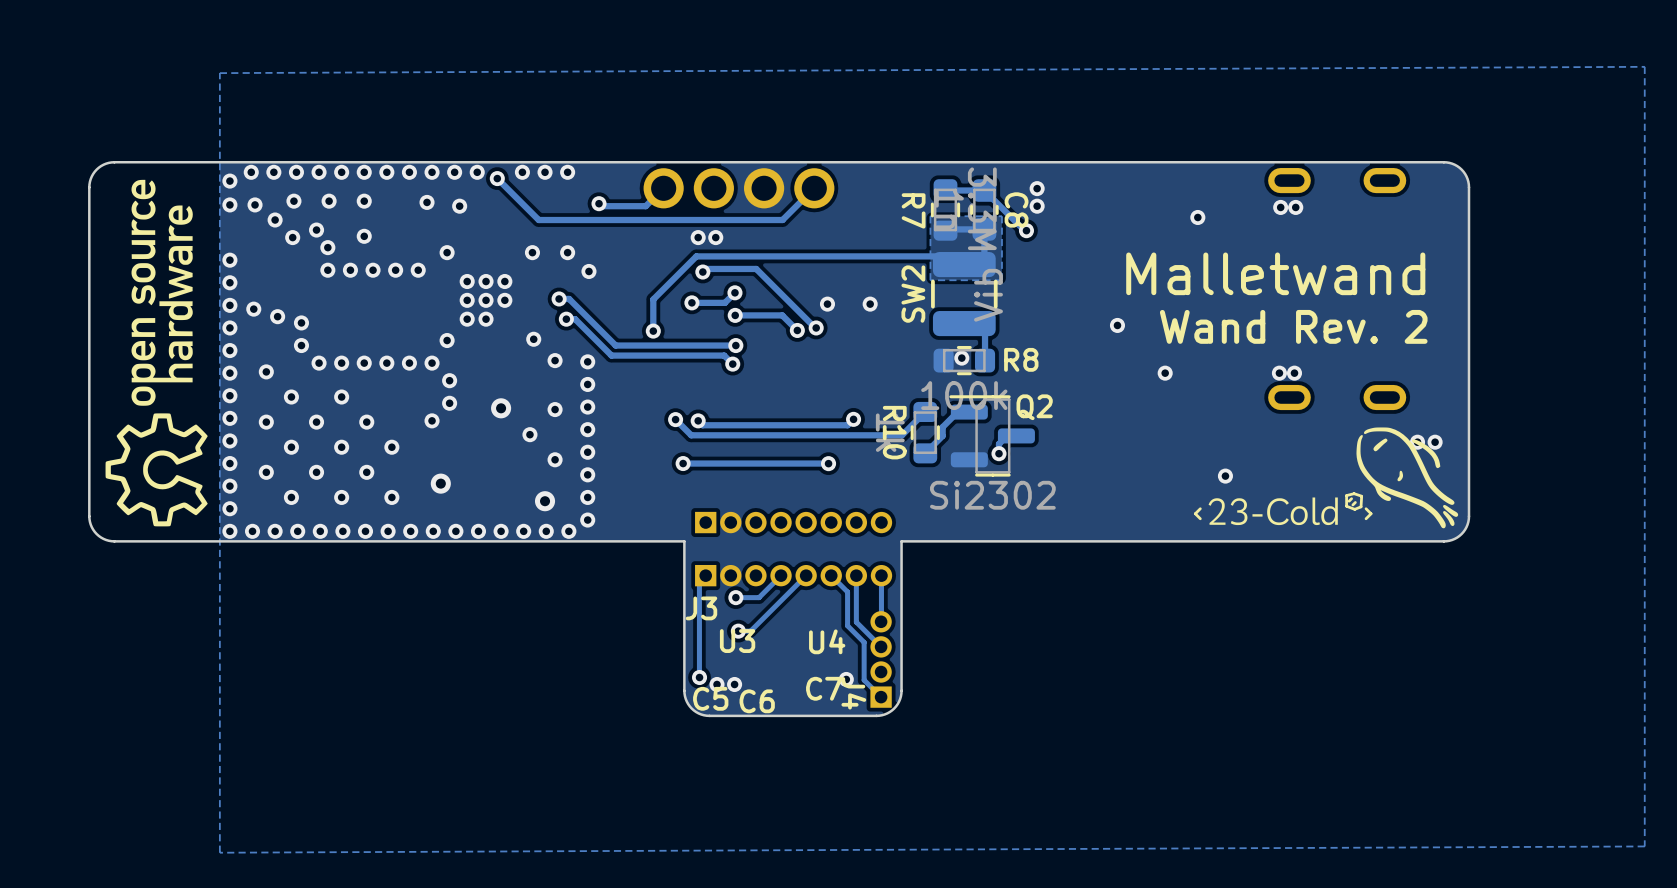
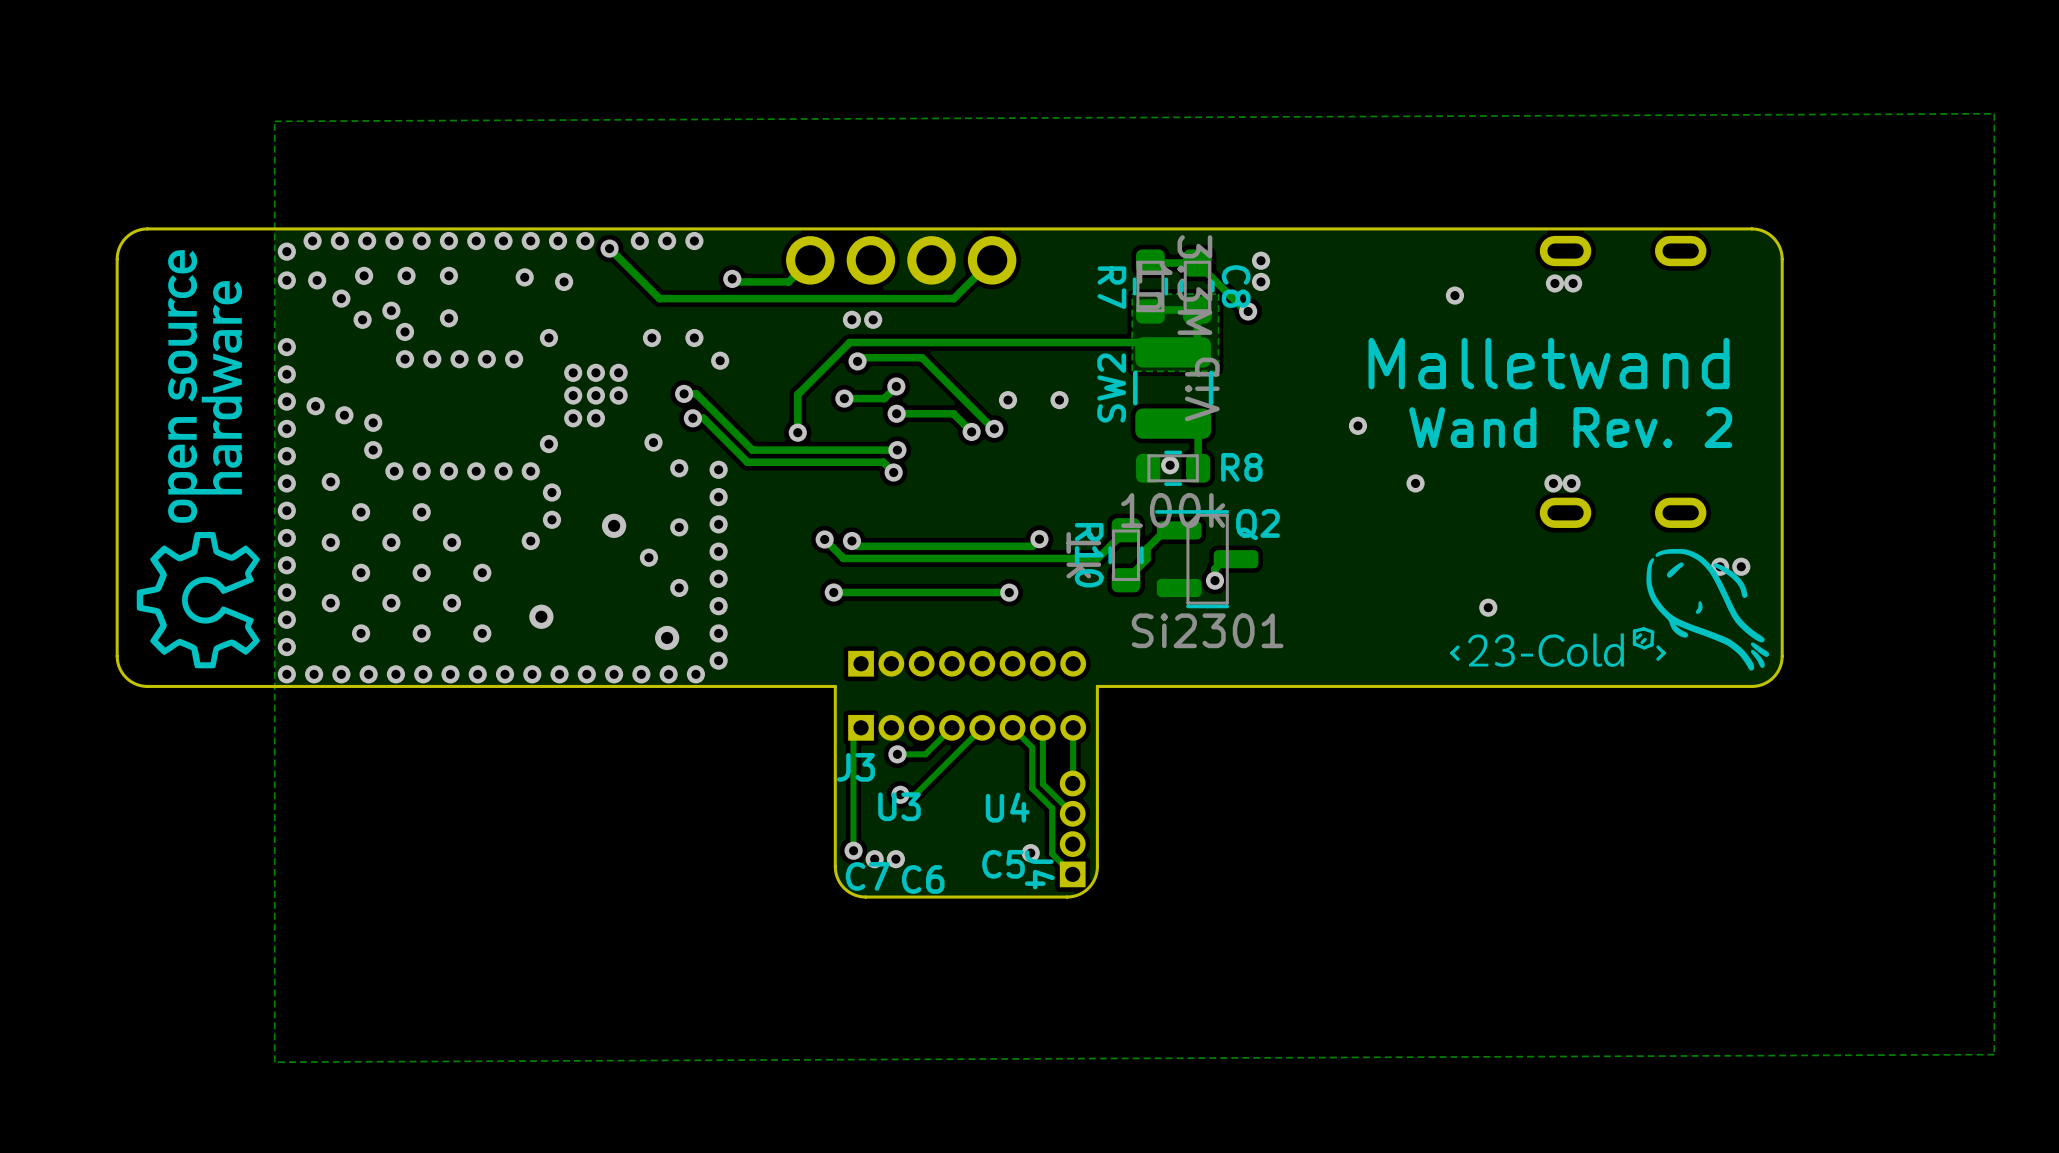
Q2 value: Si2302 (992, 495) -> Si2301 (1207, 630)
C7 name: C7 (824, 688) -> C5 (1003, 864)
C5 name: C5 (710, 698) -> C7 (867, 876)

